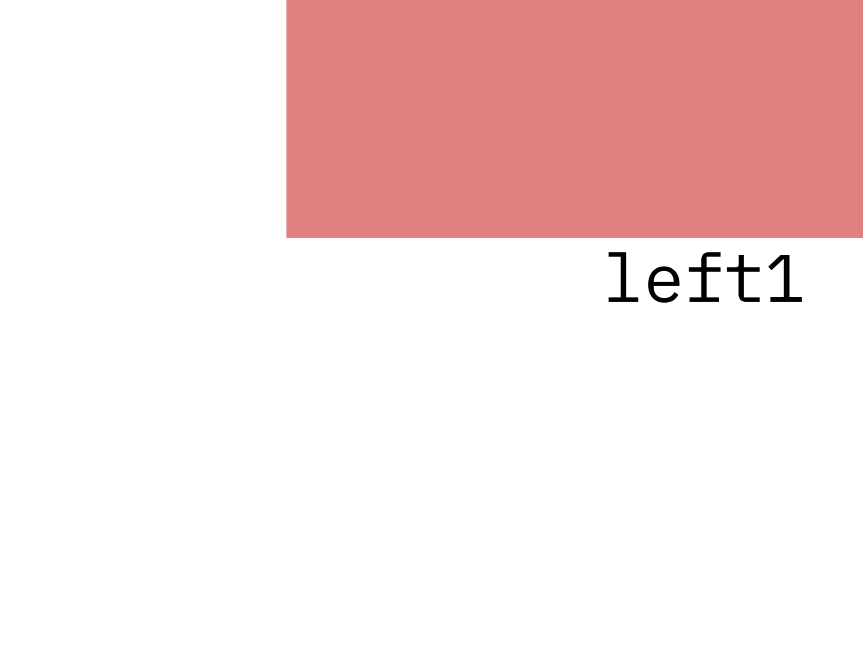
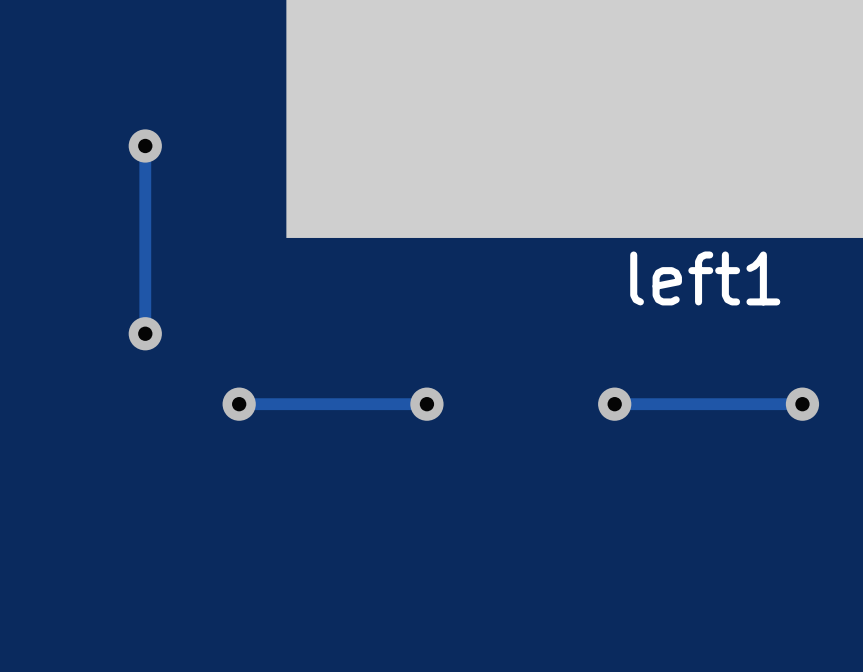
track: none -> (145, 145) (145, 333)
via: none -> (145, 145)
via: none -> (145, 333)
track: none -> (239, 404) (426, 404)
via: none -> (239, 404)
via: none -> (426, 404)
track: none -> (614, 404) (802, 404)
via: none -> (614, 404)
via: none -> (802, 404)

